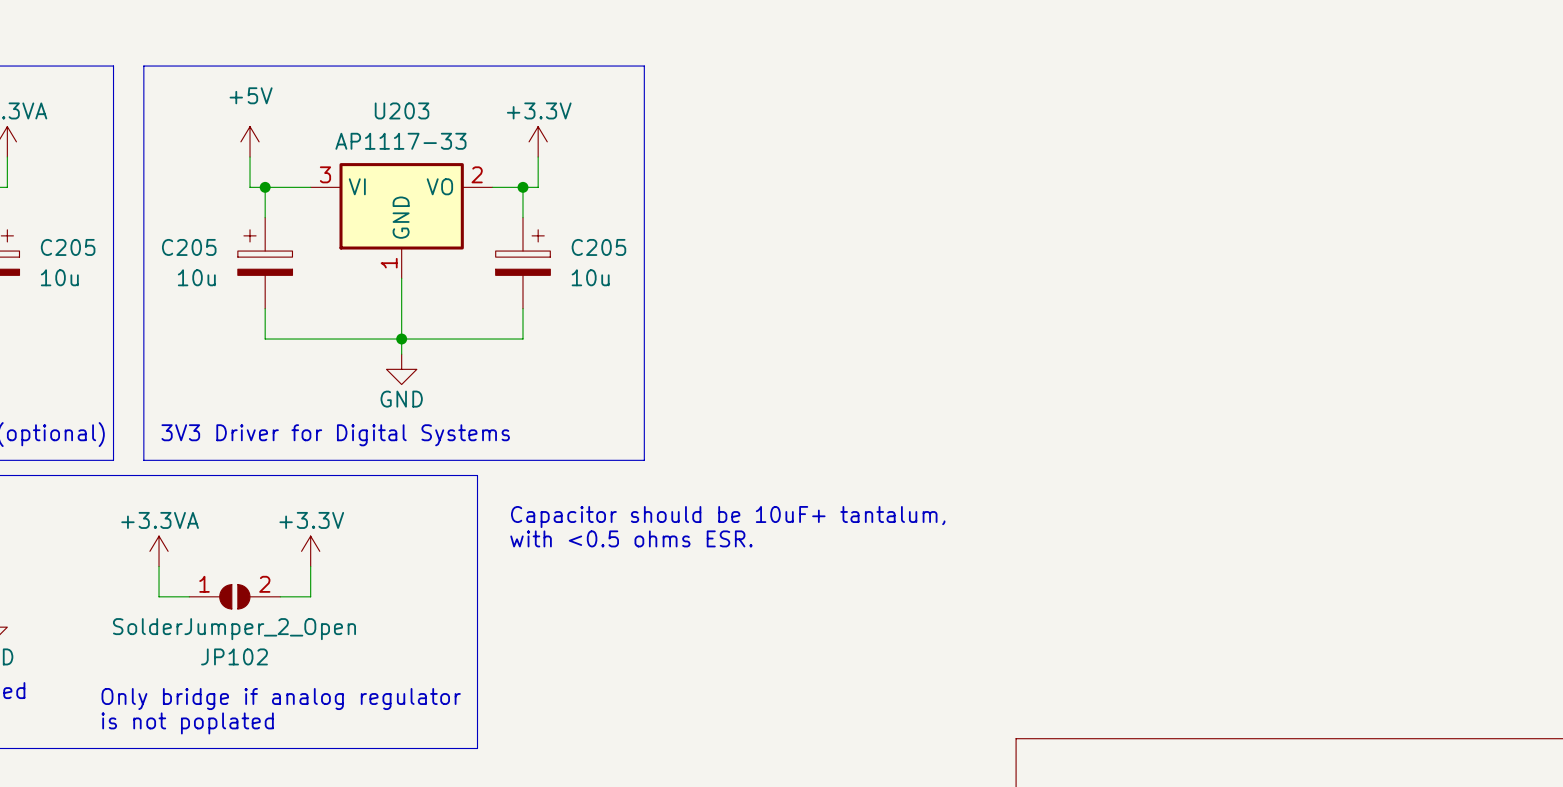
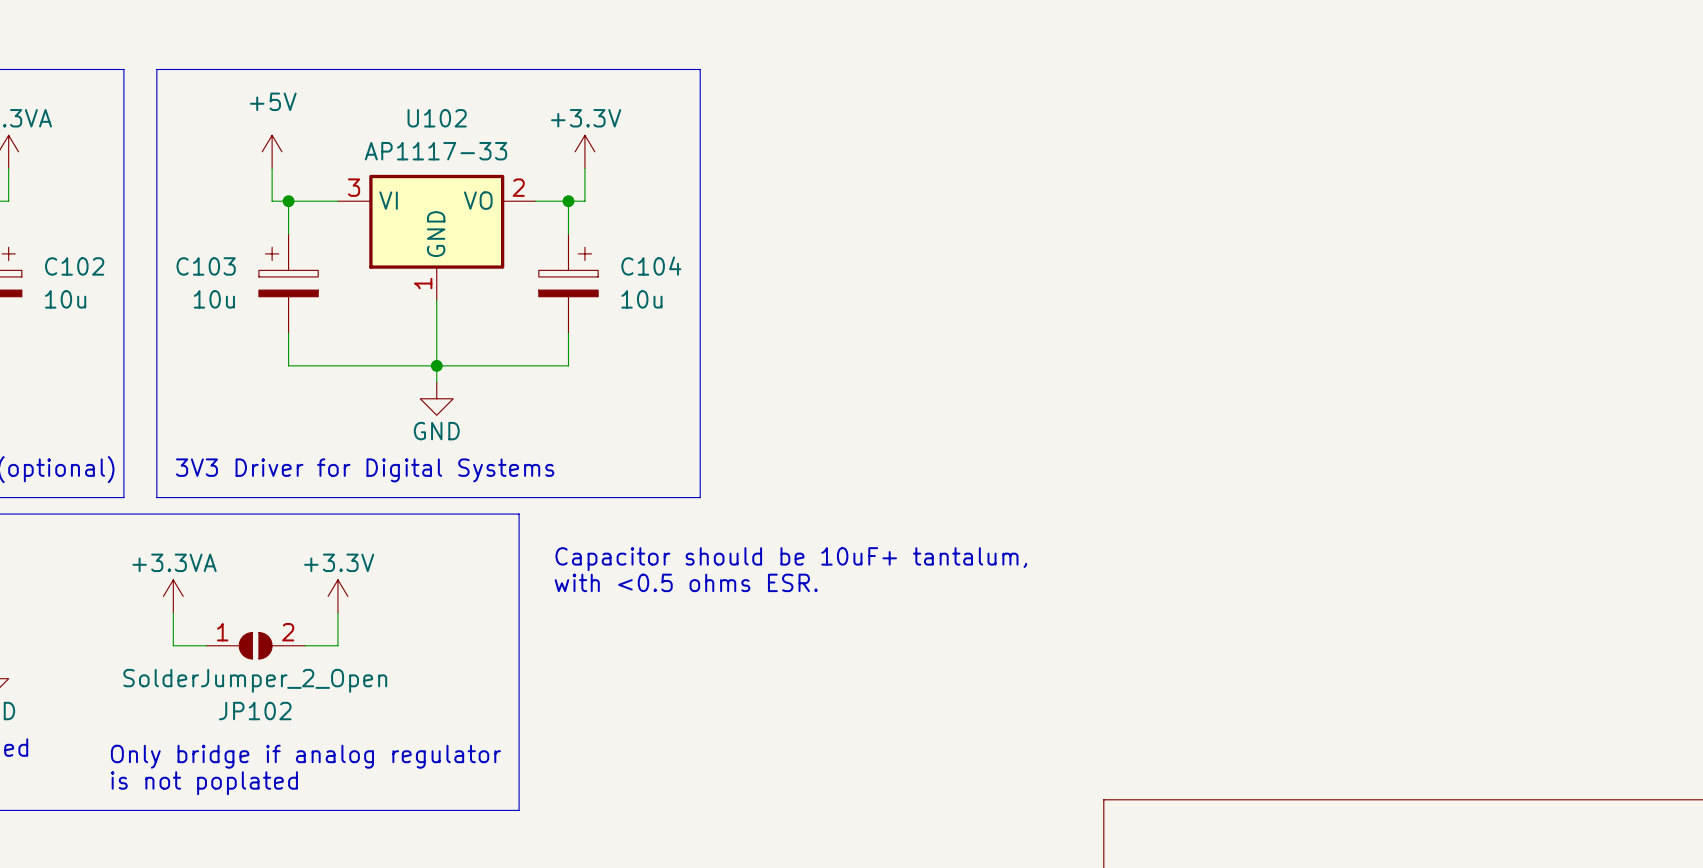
U203 name: U203 (402, 110) -> U102 (437, 118)
C205 name: C205 (68, 247) -> C102 (74, 266)
C205 name: C205 (189, 247) -> C103 (206, 266)
C205 name: C205 (598, 247) -> C104 (651, 266)

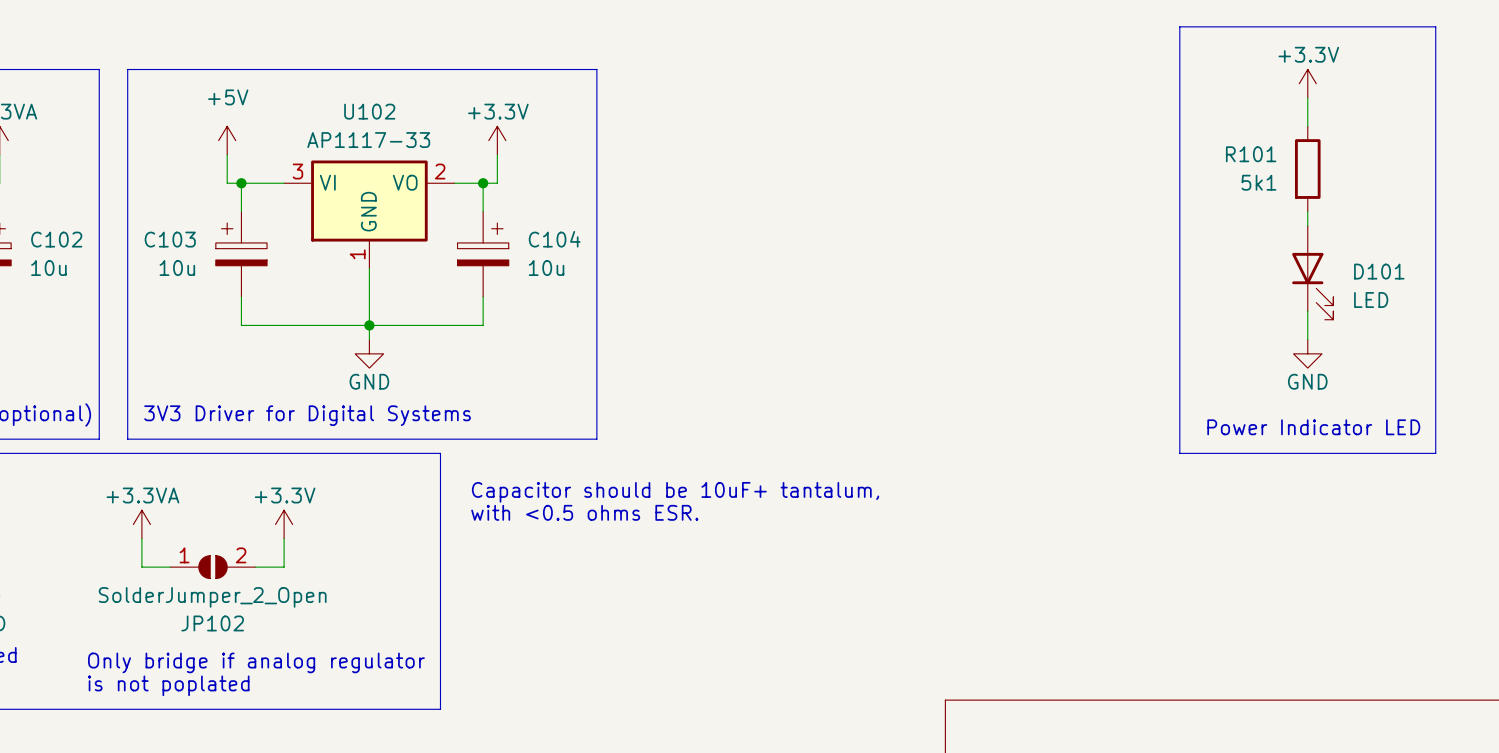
line: none -> (1179, 26) (1435, 26) (1435, 453) (1179, 453) (1179, 26)
power symbol: none -> +3.3V (1307, 83)
wire: none -> (1307, 97) (1307, 126)
R101: none -> 5k1 (1307, 169)
wire: none -> (1307, 211) (1307, 225)
D101: none -> LED (1312, 272)
wire: none -> (1307, 311) (1307, 339)
power symbol: none -> GND (1307, 353)
text: none -> Power Indicator LED (1313, 427)

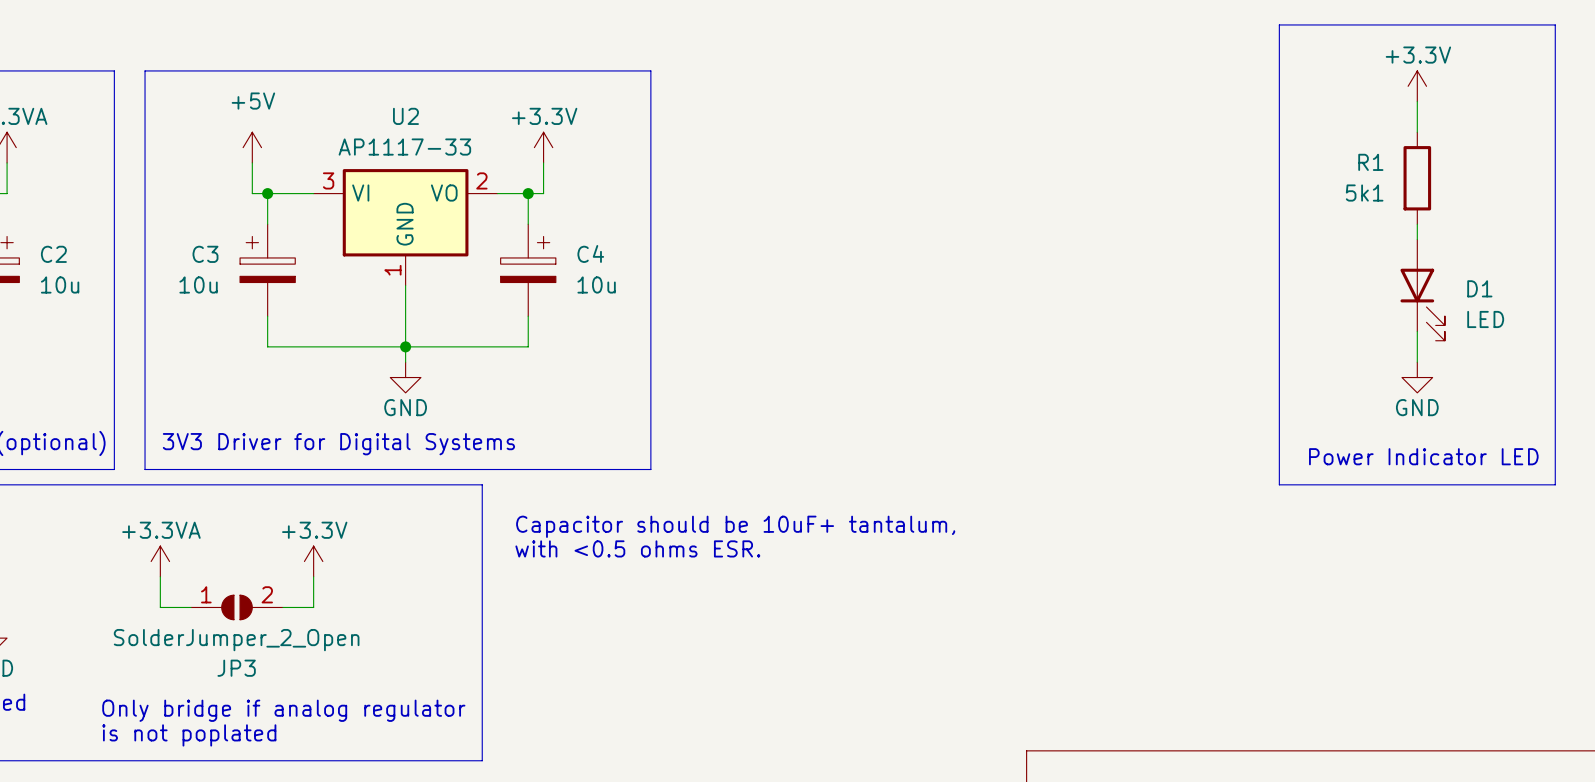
U102 name: U102 (369, 111) -> U2 (405, 116)
R101 name: R101 (1251, 154) -> R1 (1370, 162)
C102 name: C102 (56, 239) -> C2 (53, 254)
C103 name: C103 (170, 239) -> C3 (205, 254)
C104 name: C104 (554, 239) -> C4 (590, 253)
D101 name: D101 (1379, 271) -> D1 (1479, 288)
JP102 name: JP102 (212, 623) -> JP3 (236, 668)

